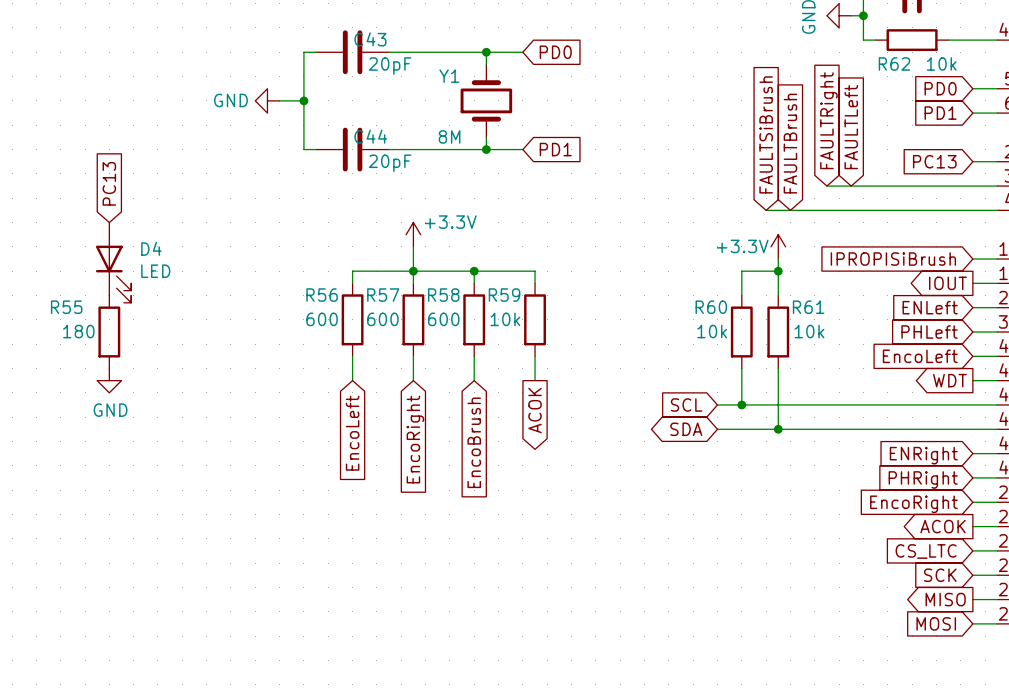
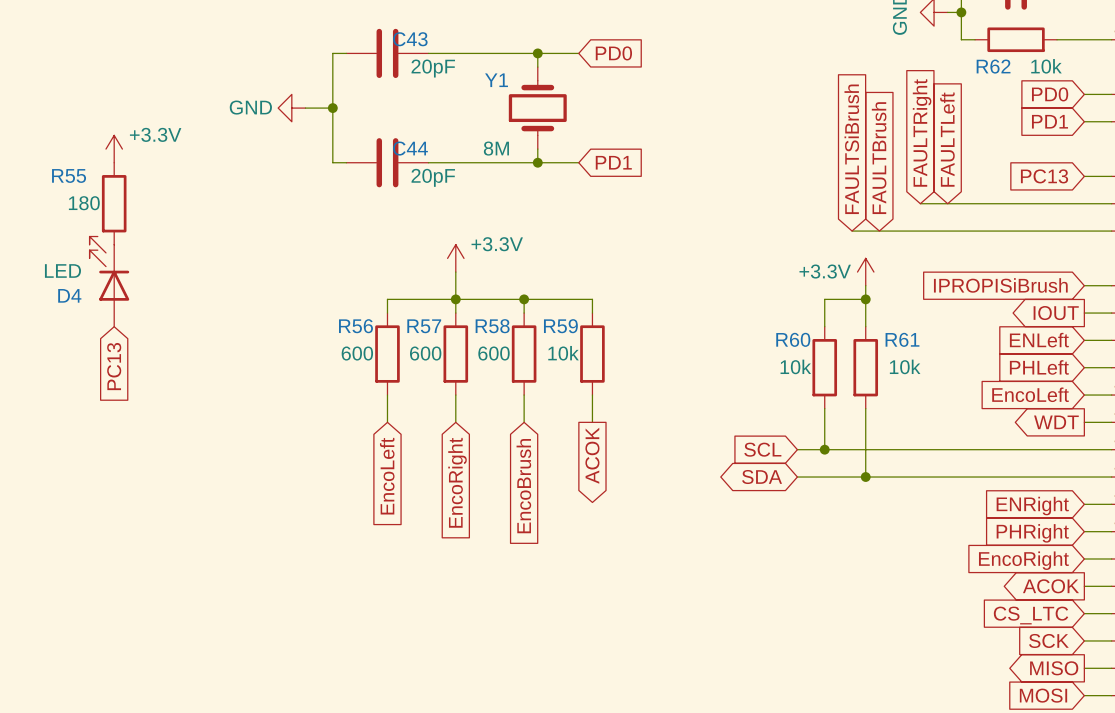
power symbol: none -> +3.3V (114, 149)
global label rotation: 0° (109, 183) -> 180° (114, 366)
global label position: PC13 (109, 183) -> PC13 (114, 366)
D4 rotation: 0° (113, 274) -> 180° (109, 268)
R55 position: (109, 332) -> (114, 203)
power symbol: GND (109, 380) -> none

